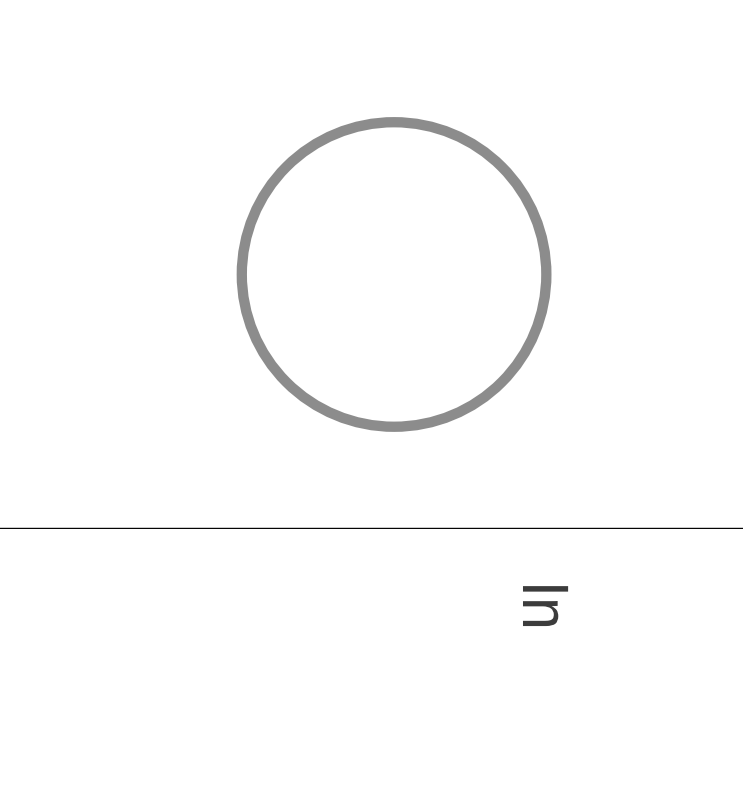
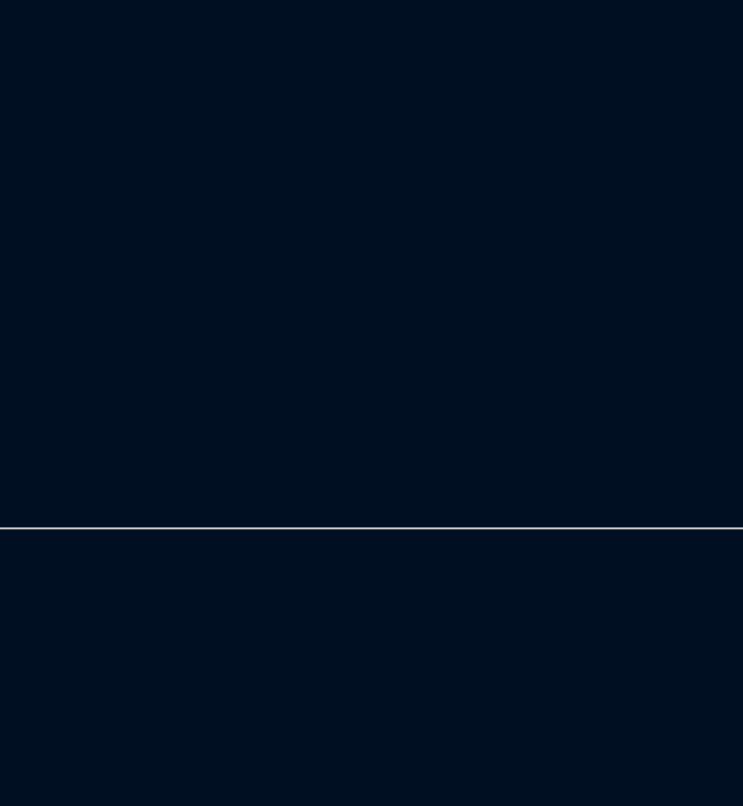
drawing: [236, 117, 552, 432] -> none
text: In (545, 606) -> none

